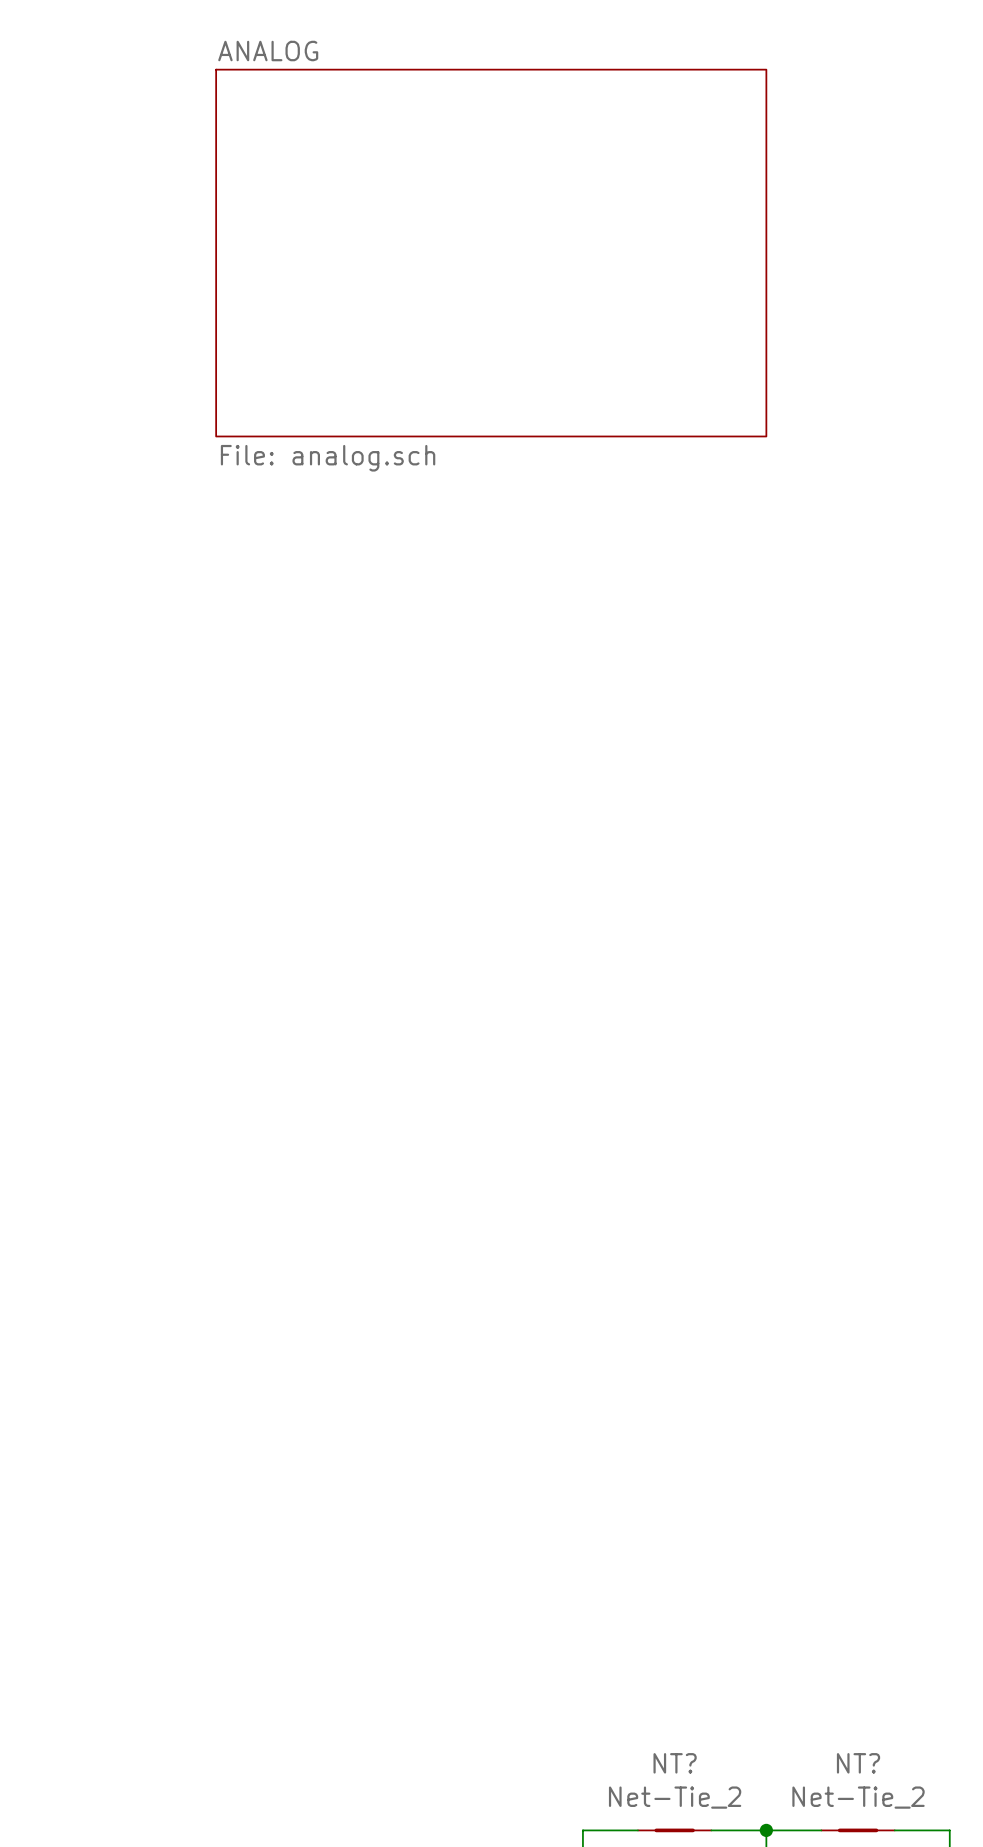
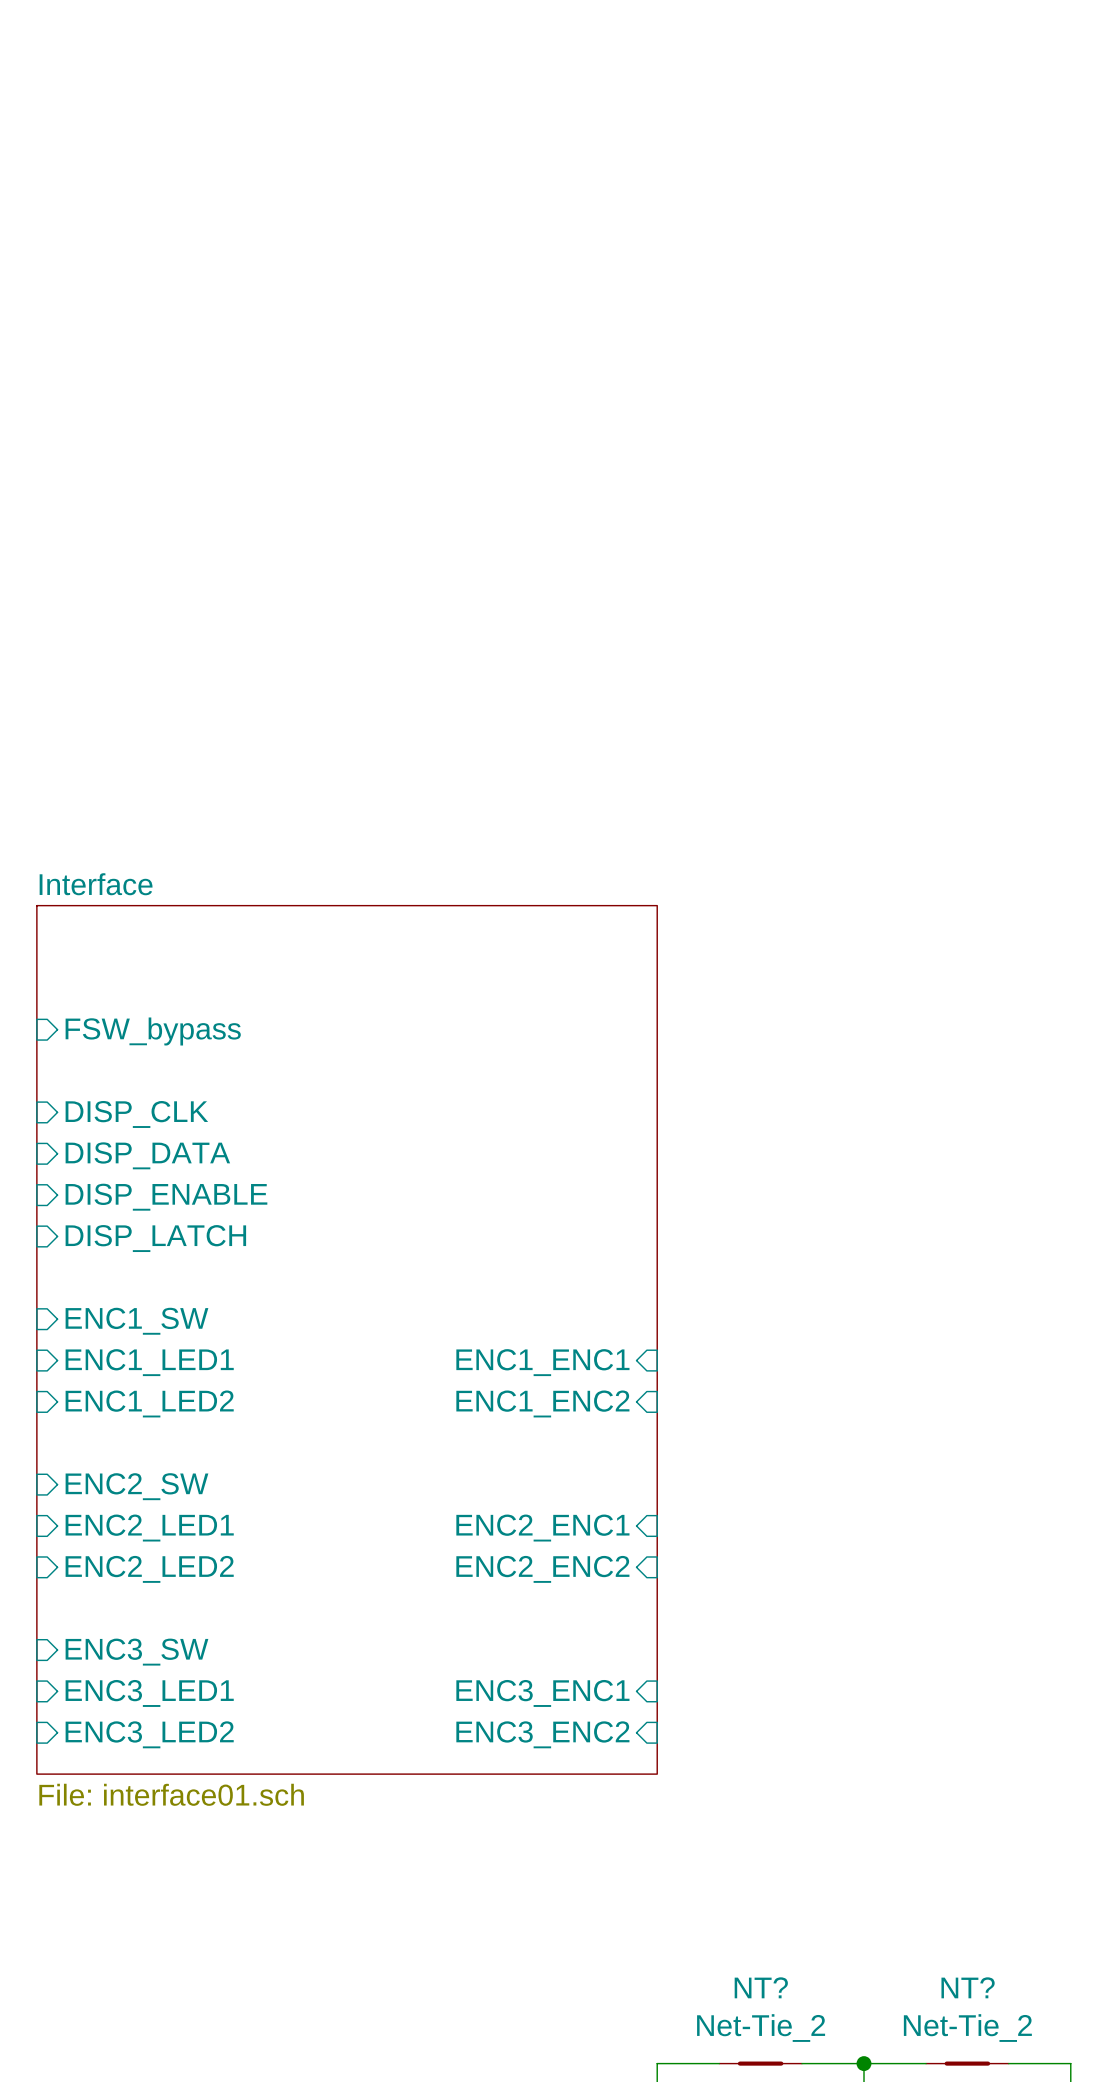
sheet ANALOG: File: analog.sch (491, 253) -> none
sheet pin: none -> FSW_bypass (153, 1031)
sheet pin: none -> DISP_CLK (136, 1114)
sheet pin: none -> DISP_DATA (147, 1155)
sheet pin: none -> DISP_ENABLE (166, 1197)
sheet pin: none -> DISP_LATCH (155, 1238)
sheet pin: none -> ENC1_SW (136, 1321)
sheet Interface: none -> File: interface01.sch (347, 1339)
sheet pin: none -> ENC1_LED1 (149, 1362)
sheet pin: none -> ENC1_ENC1 (542, 1362)
sheet pin: none -> ENC1_LED2 (149, 1403)
sheet pin: none -> ENC1_ENC2 (542, 1403)
sheet pin: none -> ENC2_SW (136, 1486)
sheet pin: none -> ENC2_LED1 (149, 1528)
sheet pin: none -> ENC2_ENC1 (542, 1528)
sheet pin: none -> ENC2_LED2 (149, 1569)
sheet pin: none -> ENC2_ENC2 (542, 1569)
sheet pin: none -> ENC3_SW (136, 1652)
sheet pin: none -> ENC3_LED1 (149, 1693)
sheet pin: none -> ENC3_ENC1 (542, 1693)
sheet pin: none -> ENC3_LED2 (149, 1734)
sheet pin: none -> ENC3_ENC2 (542, 1734)

